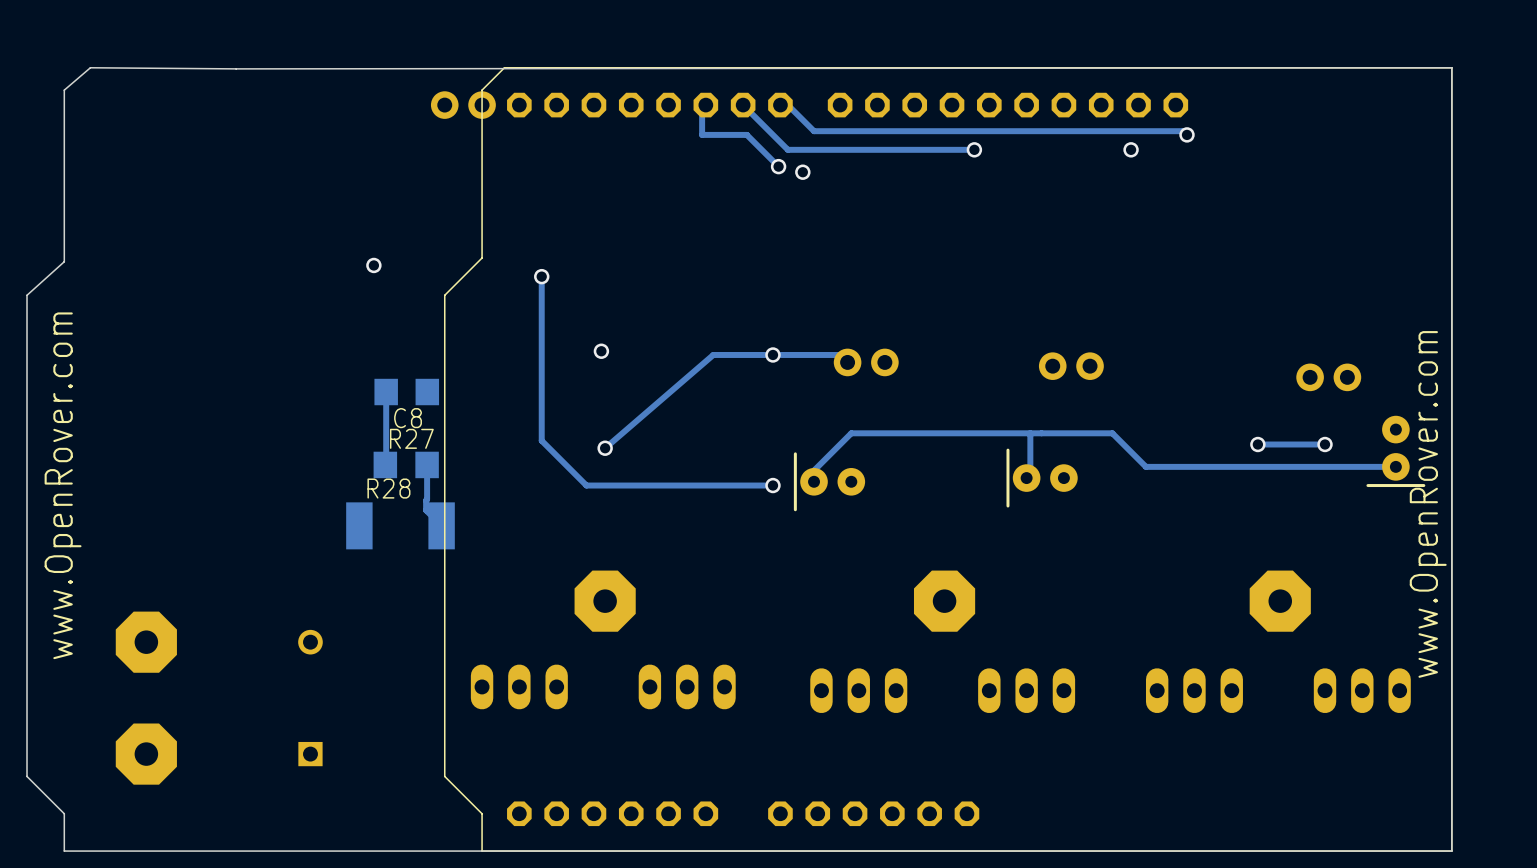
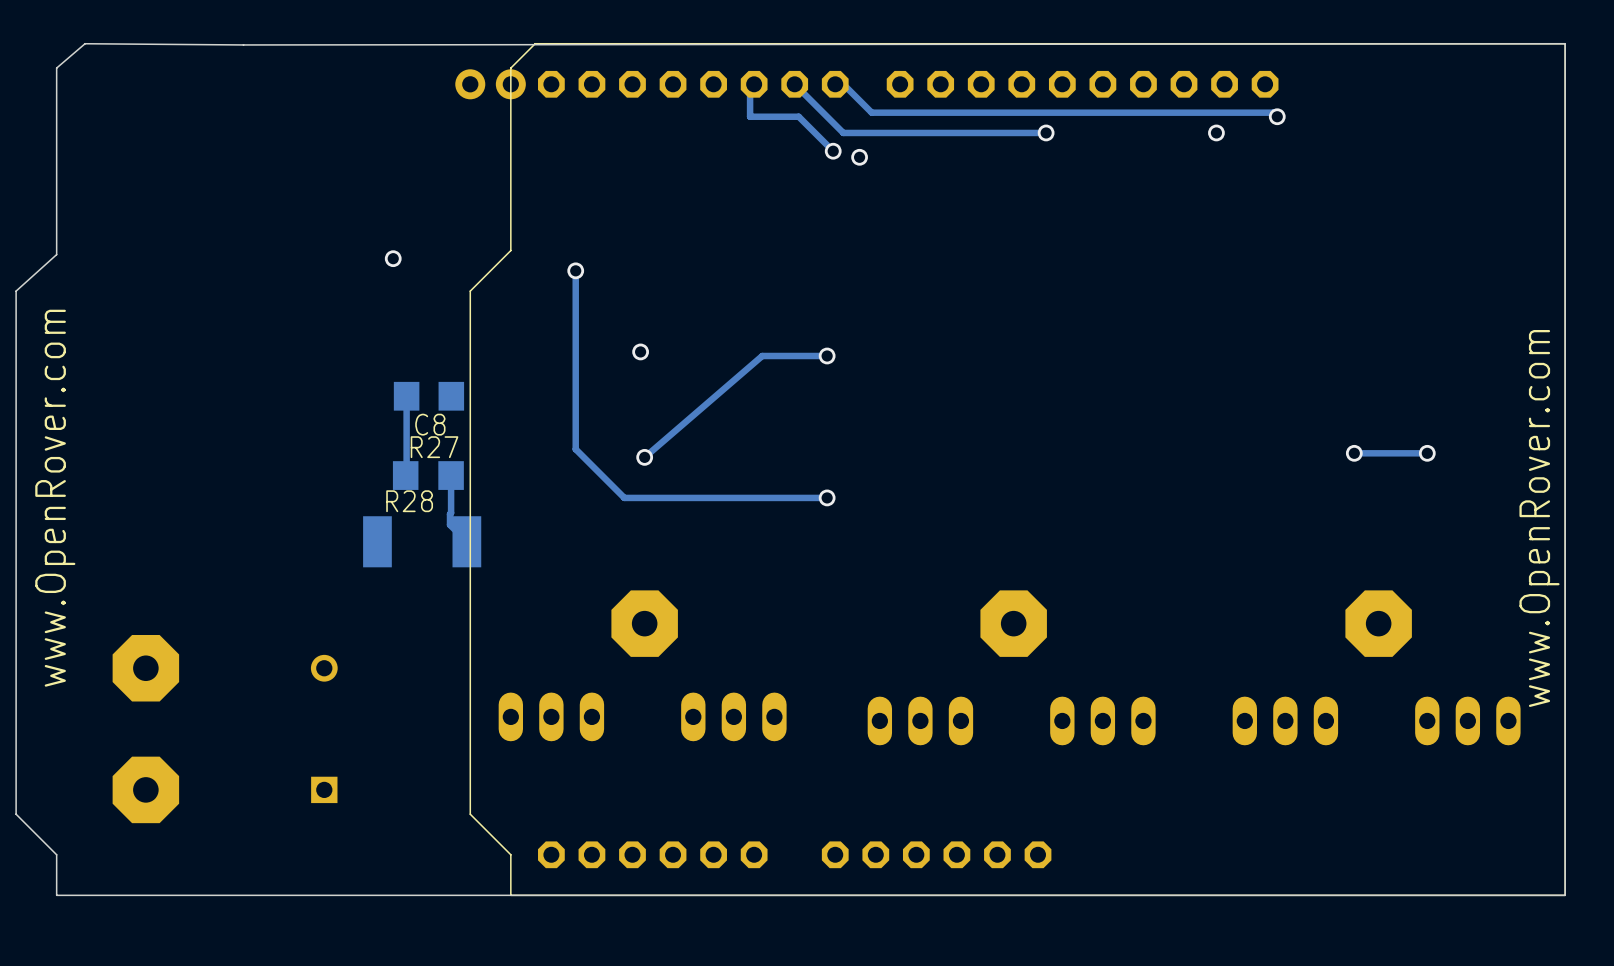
track: (772, 354) (840, 354) (847, 362) -> none
part: (866, 362) -> none
part: (1071, 366) -> none
part: (1328, 377) -> none
track: (1030, 433) (1030, 474) (1026, 478) -> none
part: (1395, 451) -> none
track: (1395, 466) (1145, 466) (1112, 433) (851, 433) (814, 470) (814, 481) -> none
part: (1042, 478) -> none
part: (829, 481) -> none

